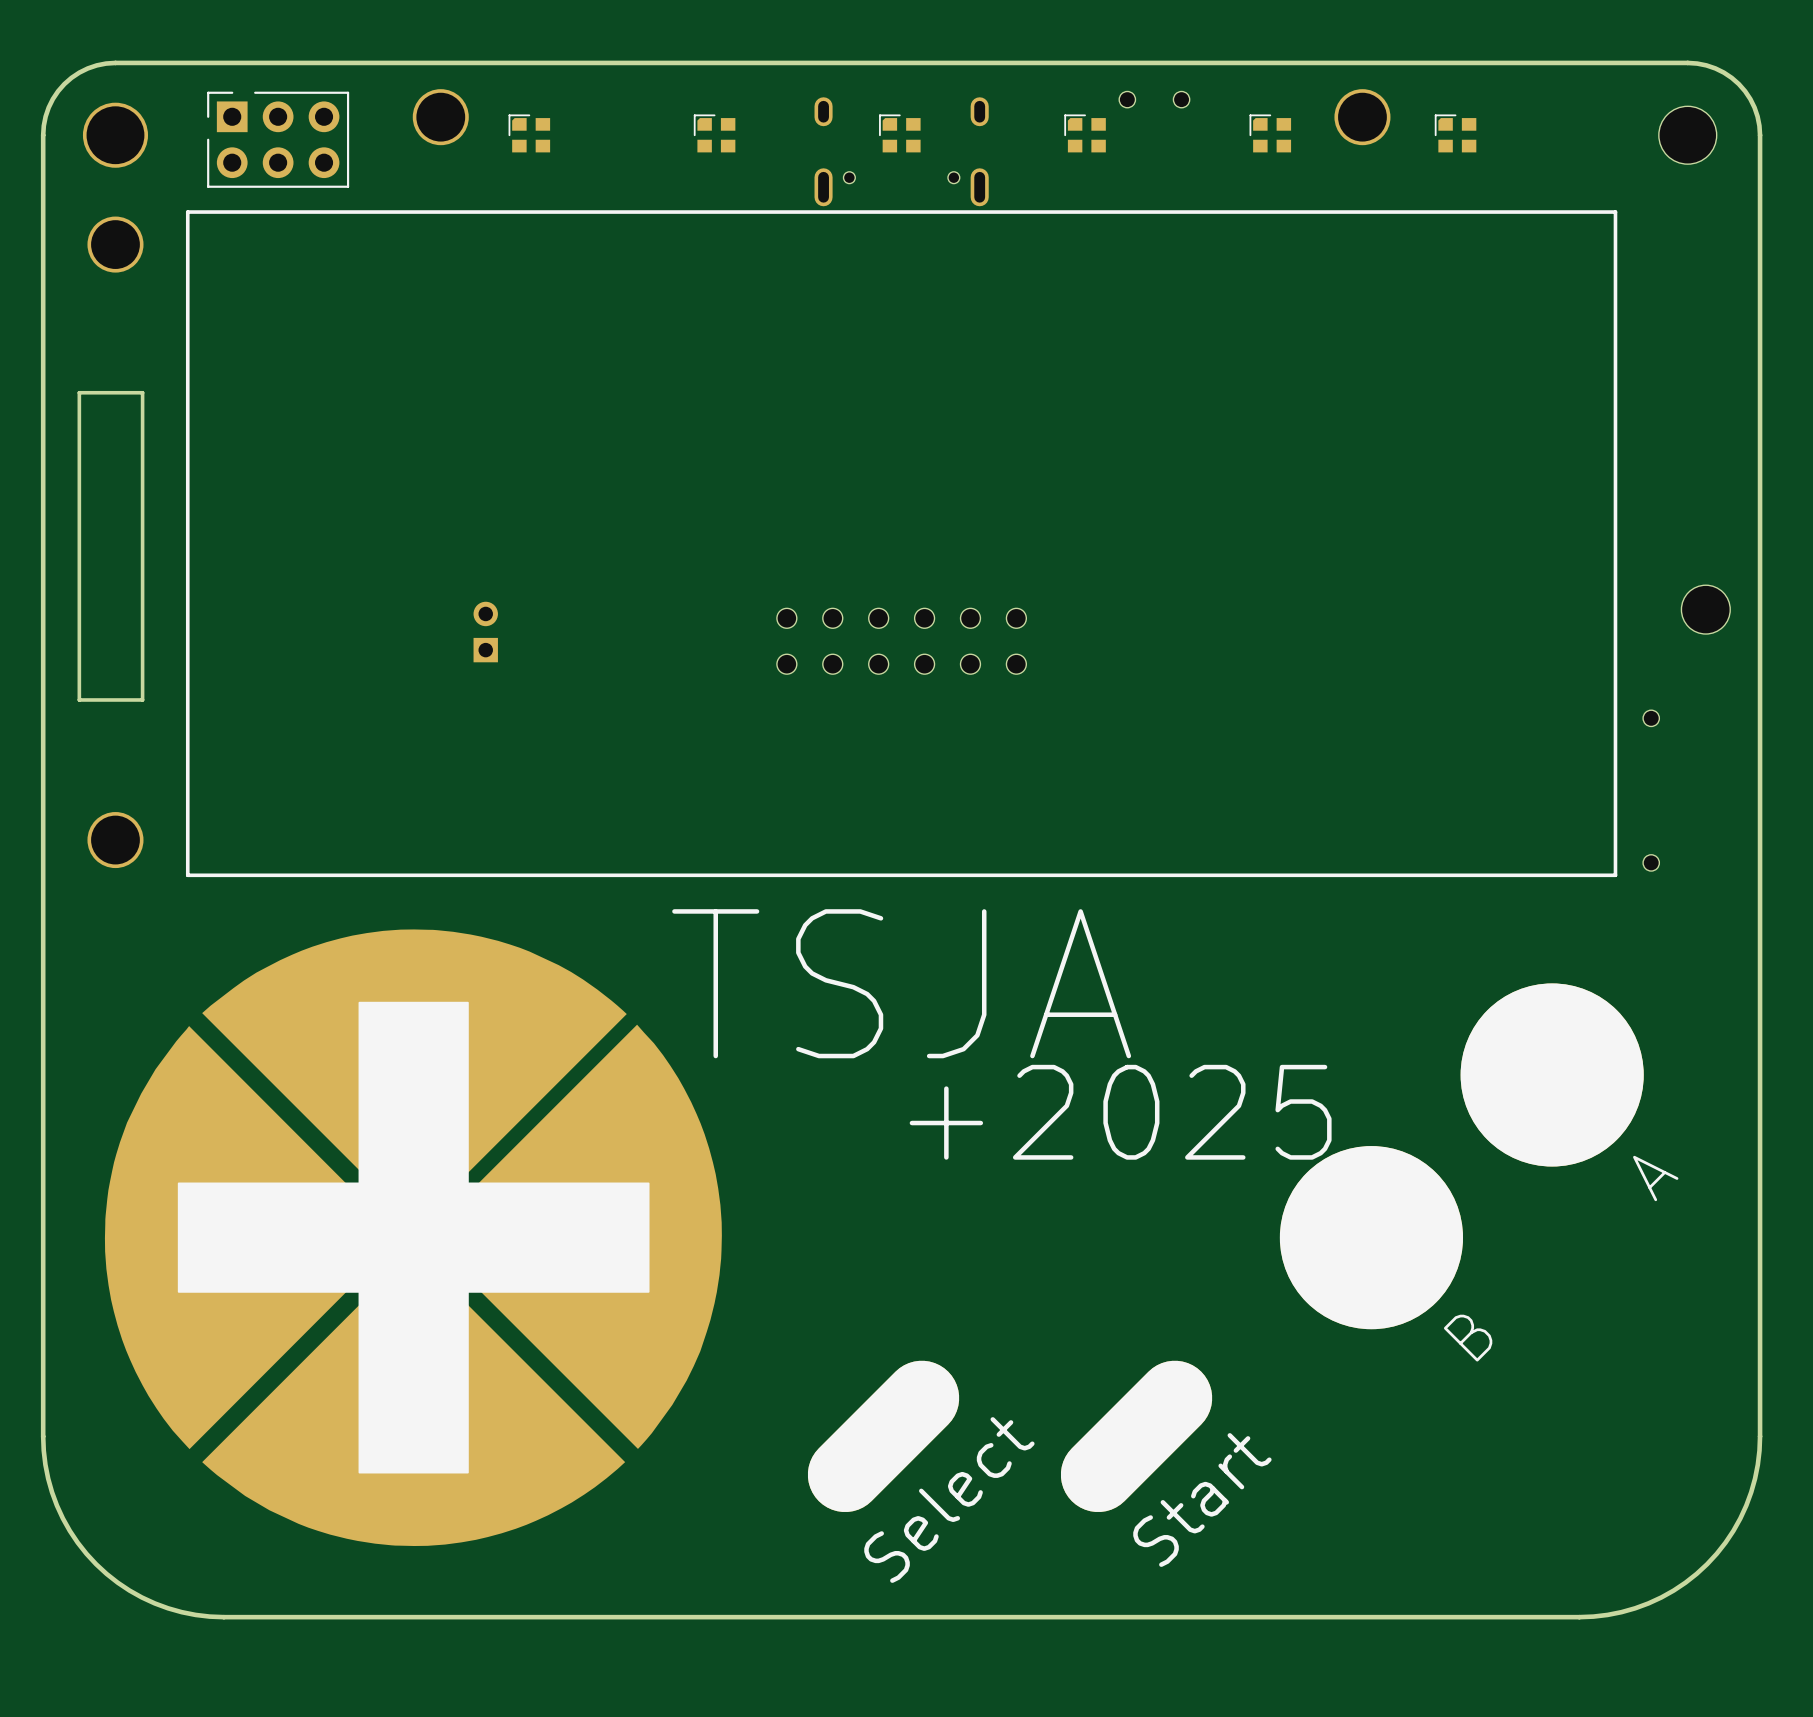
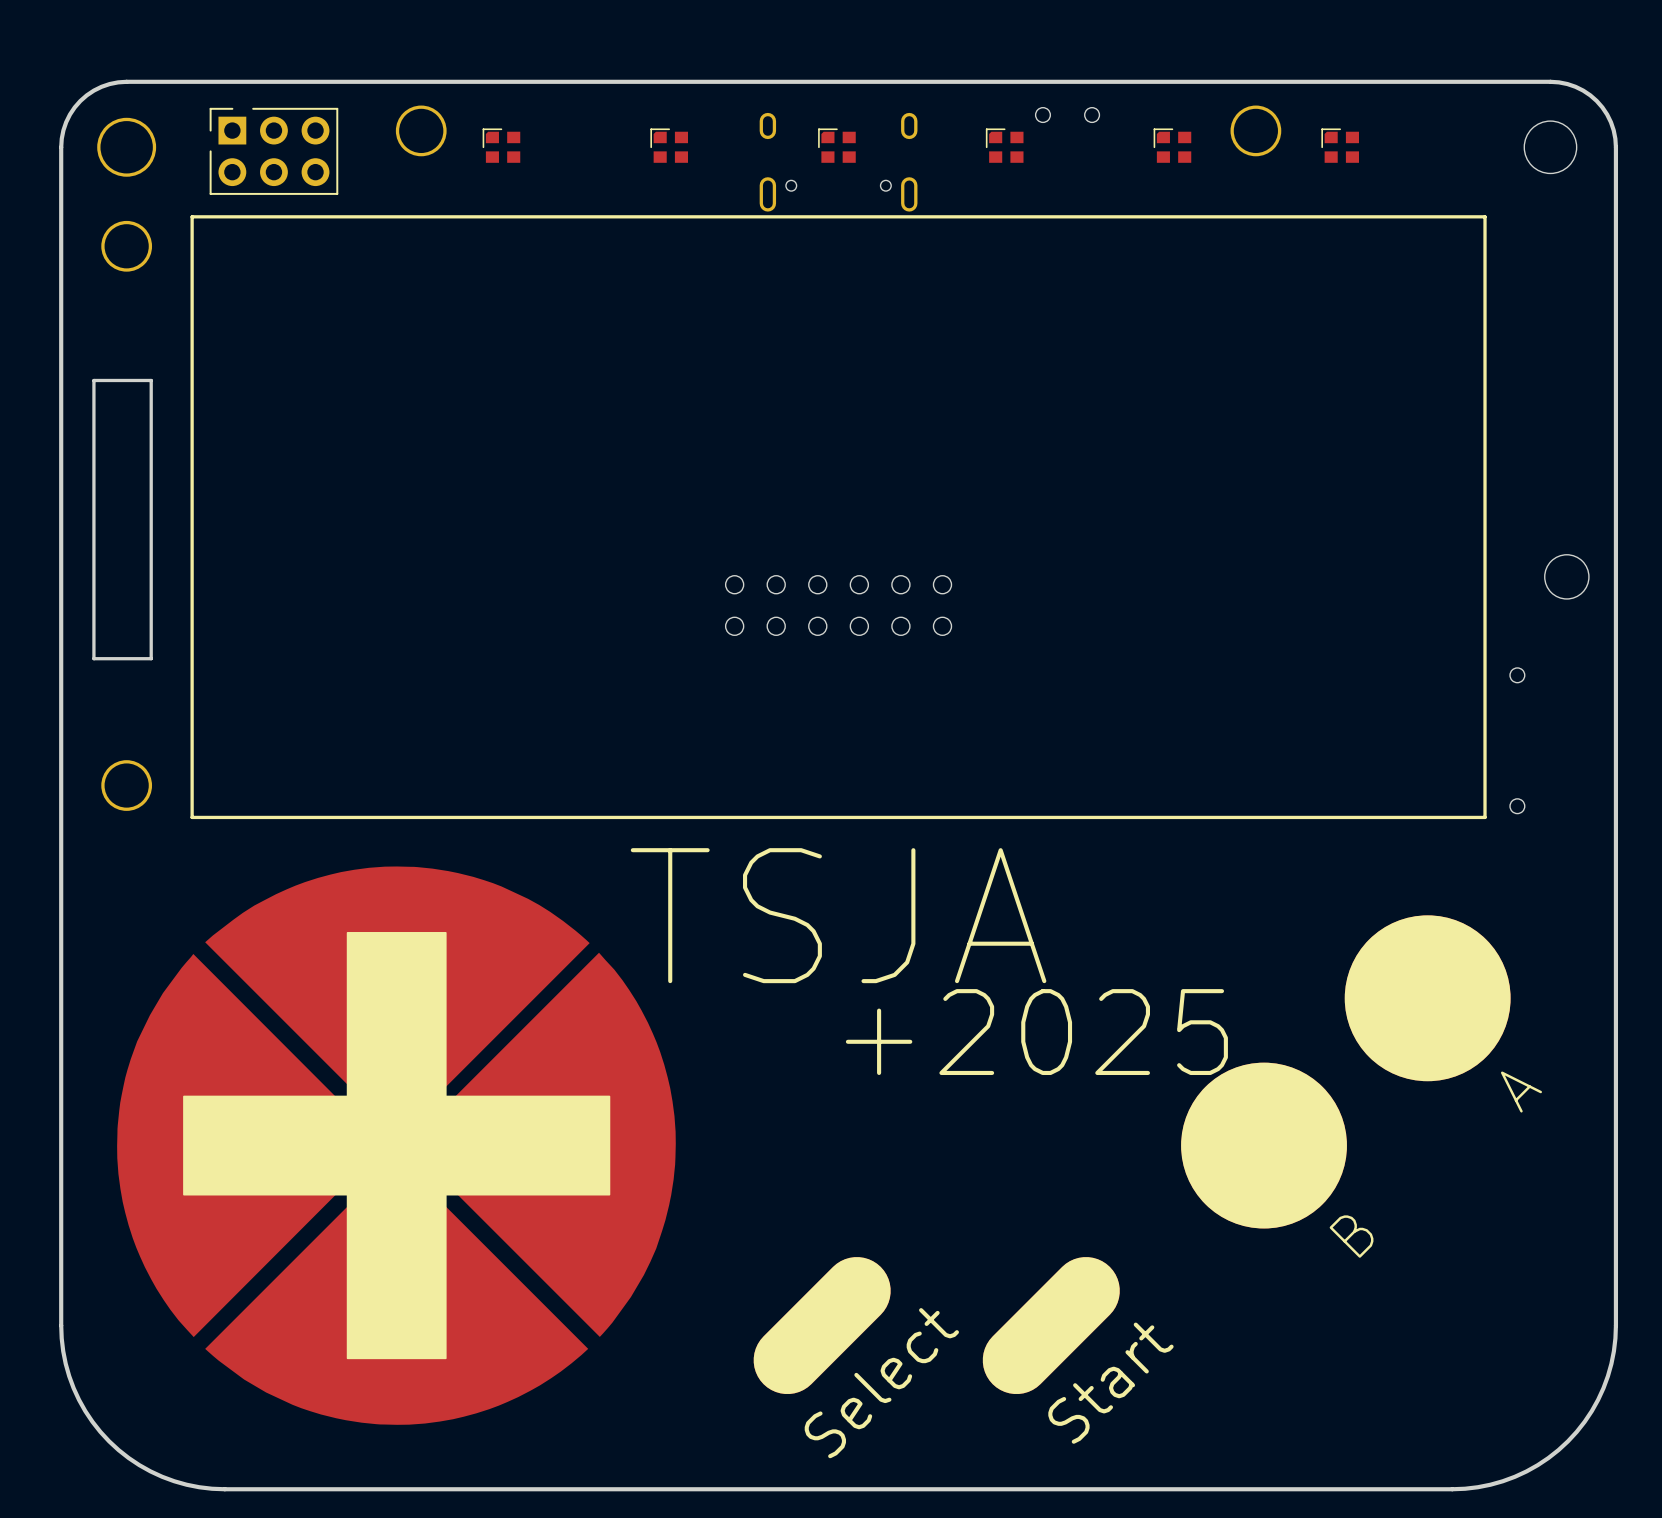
part: (485, 632) -> none

